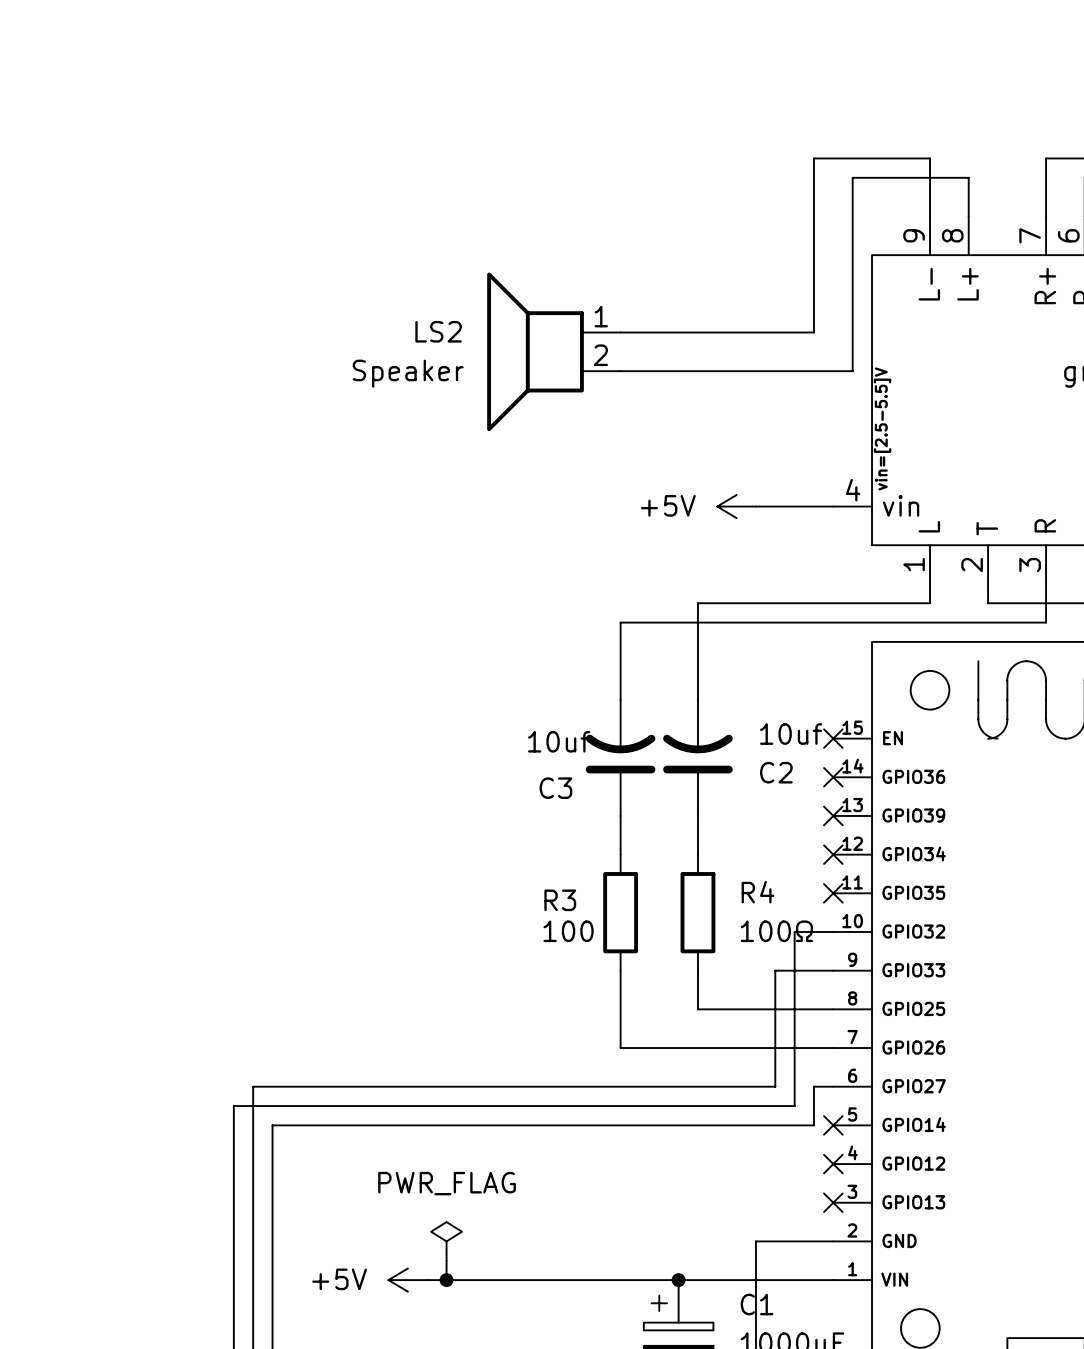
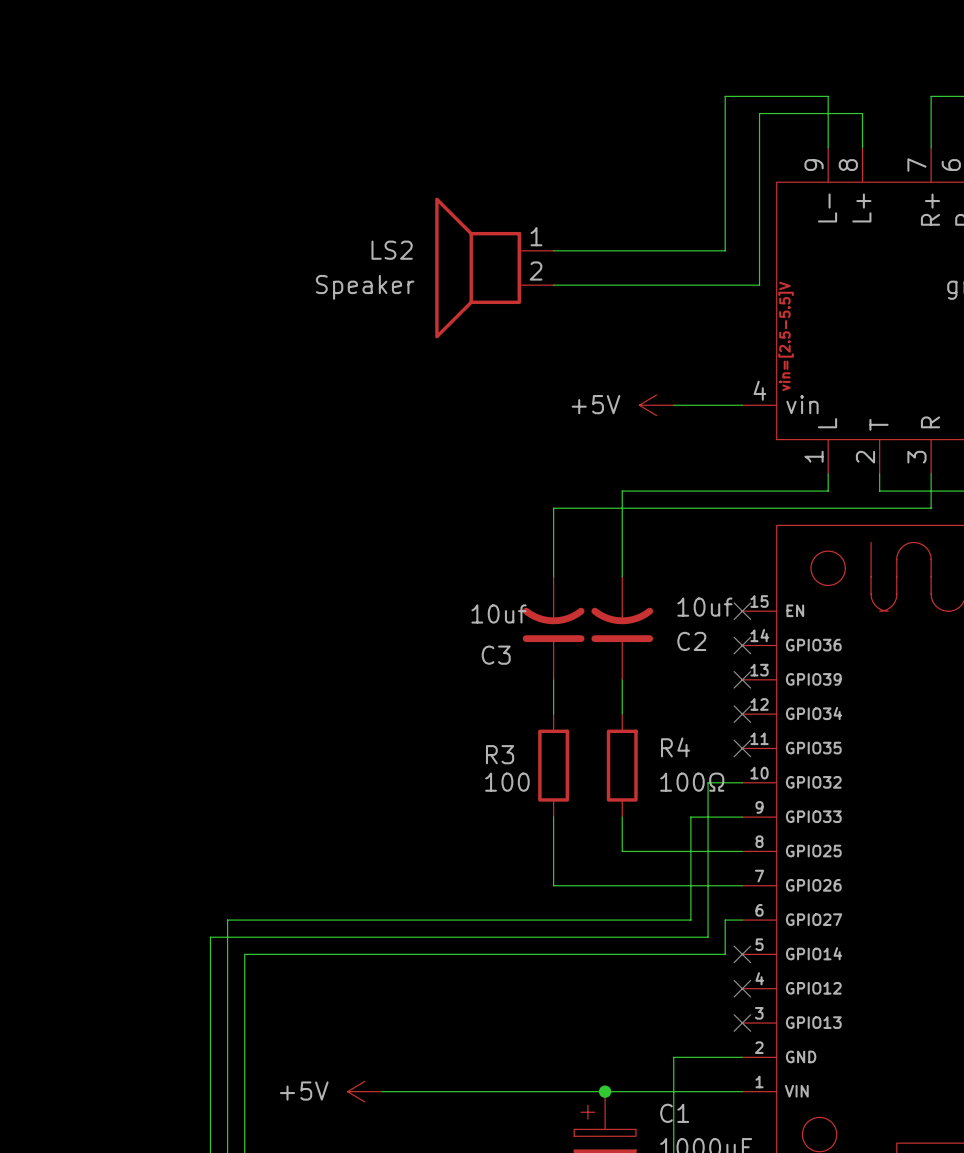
power symbol: PWR_FLAG (446, 1241) -> none
wire: (446, 1260) (446, 1280) -> none
junction: (446, 1280) -> none

